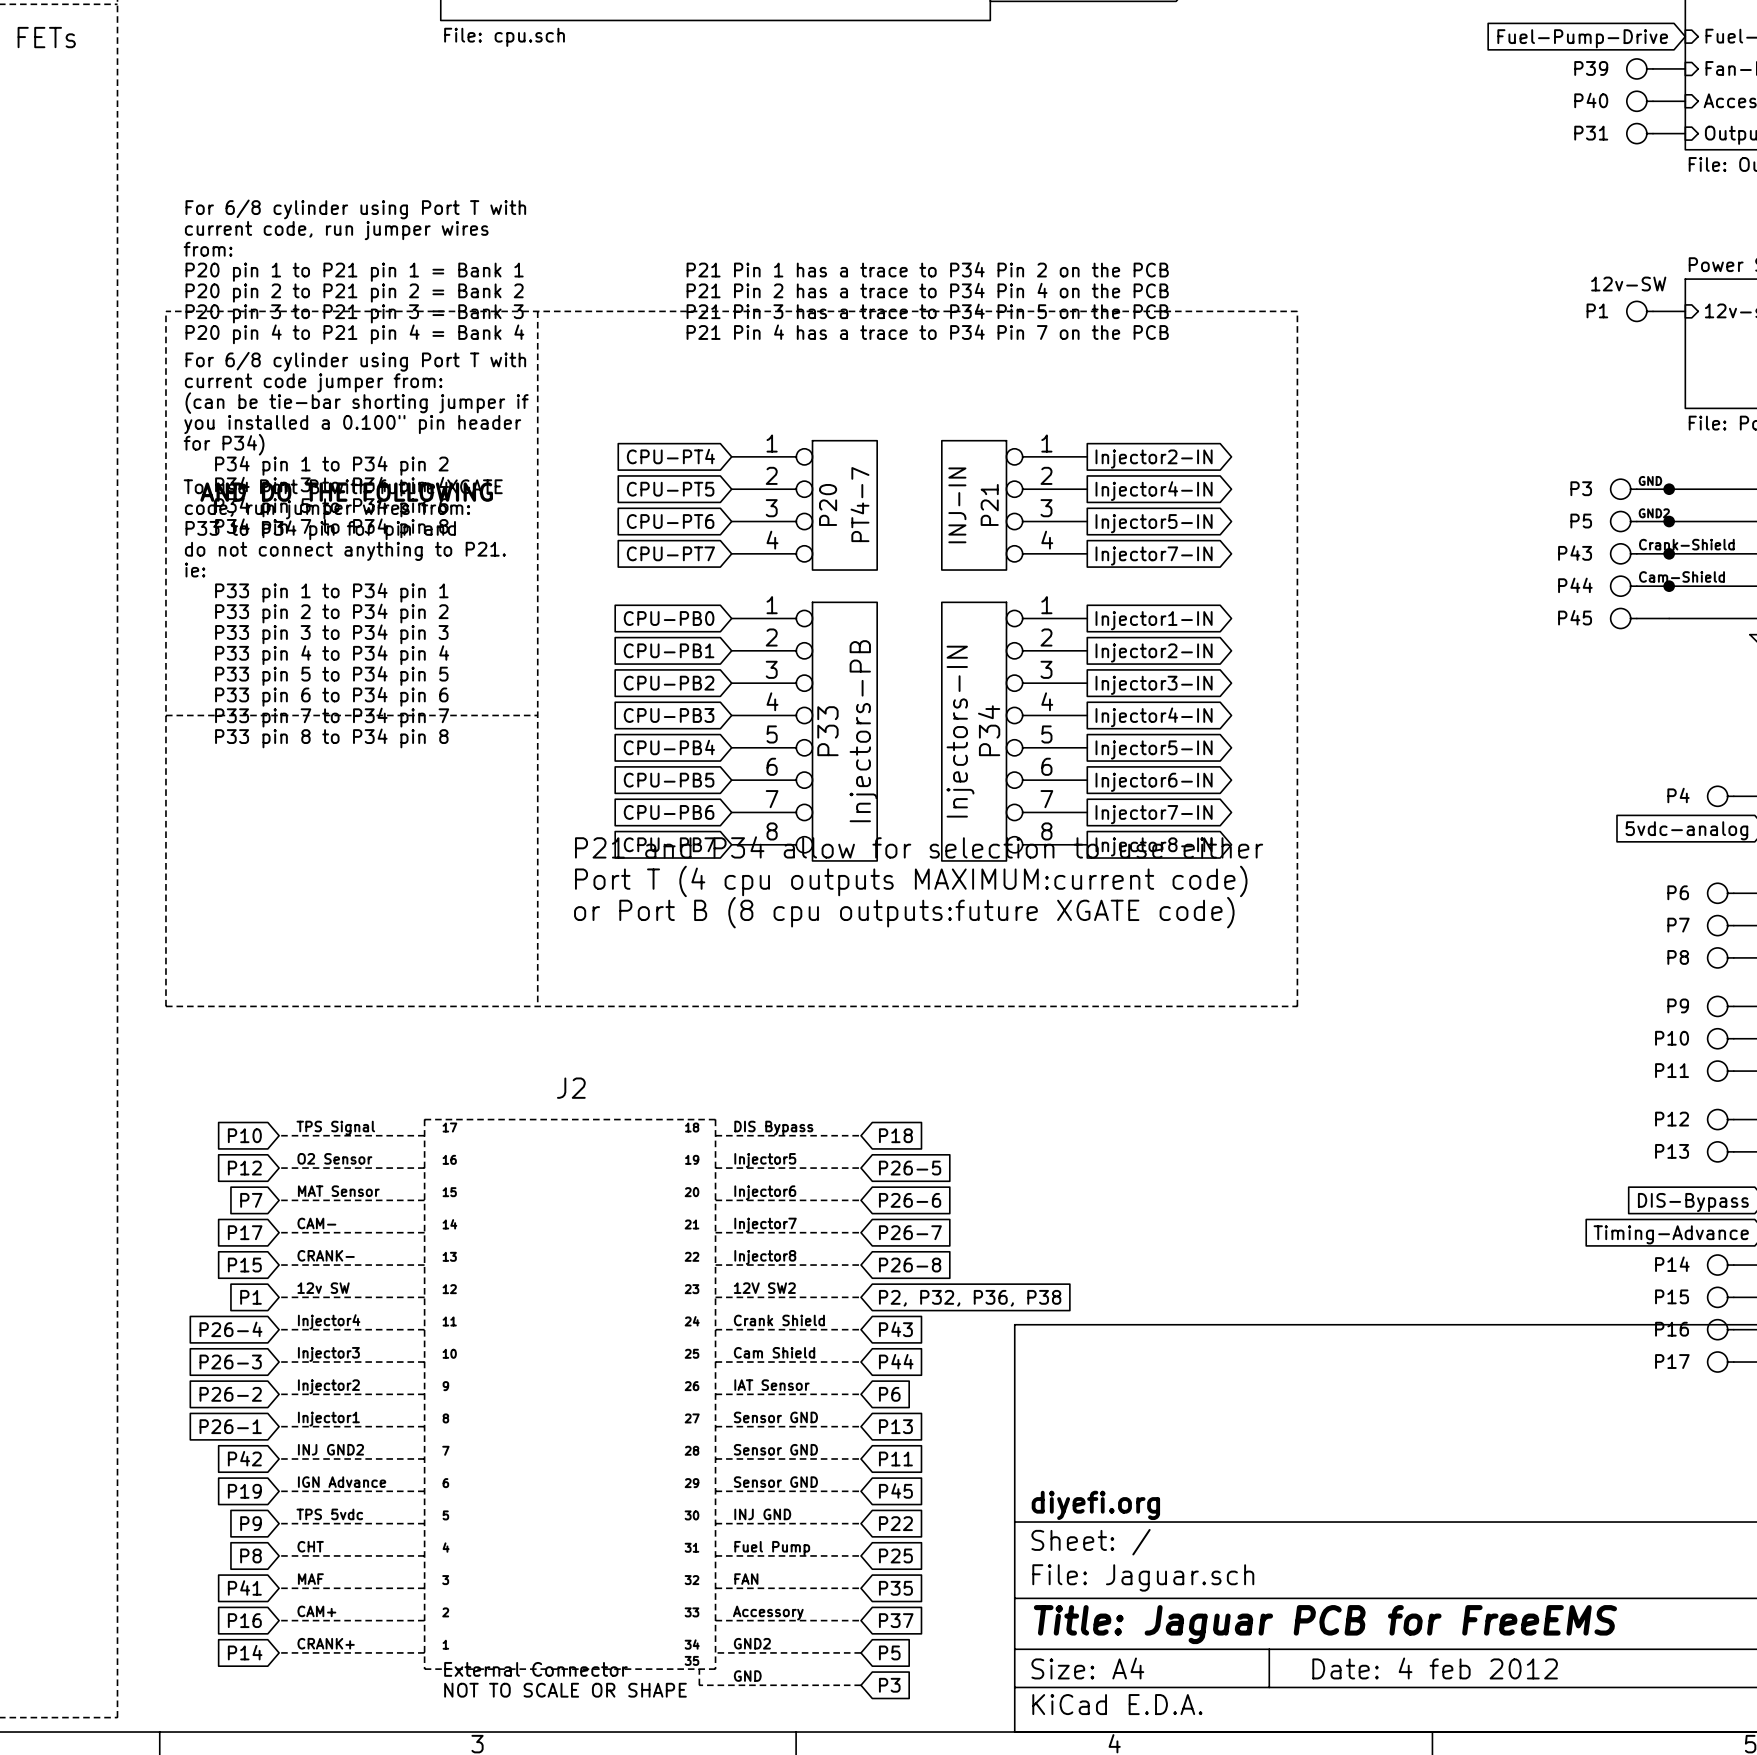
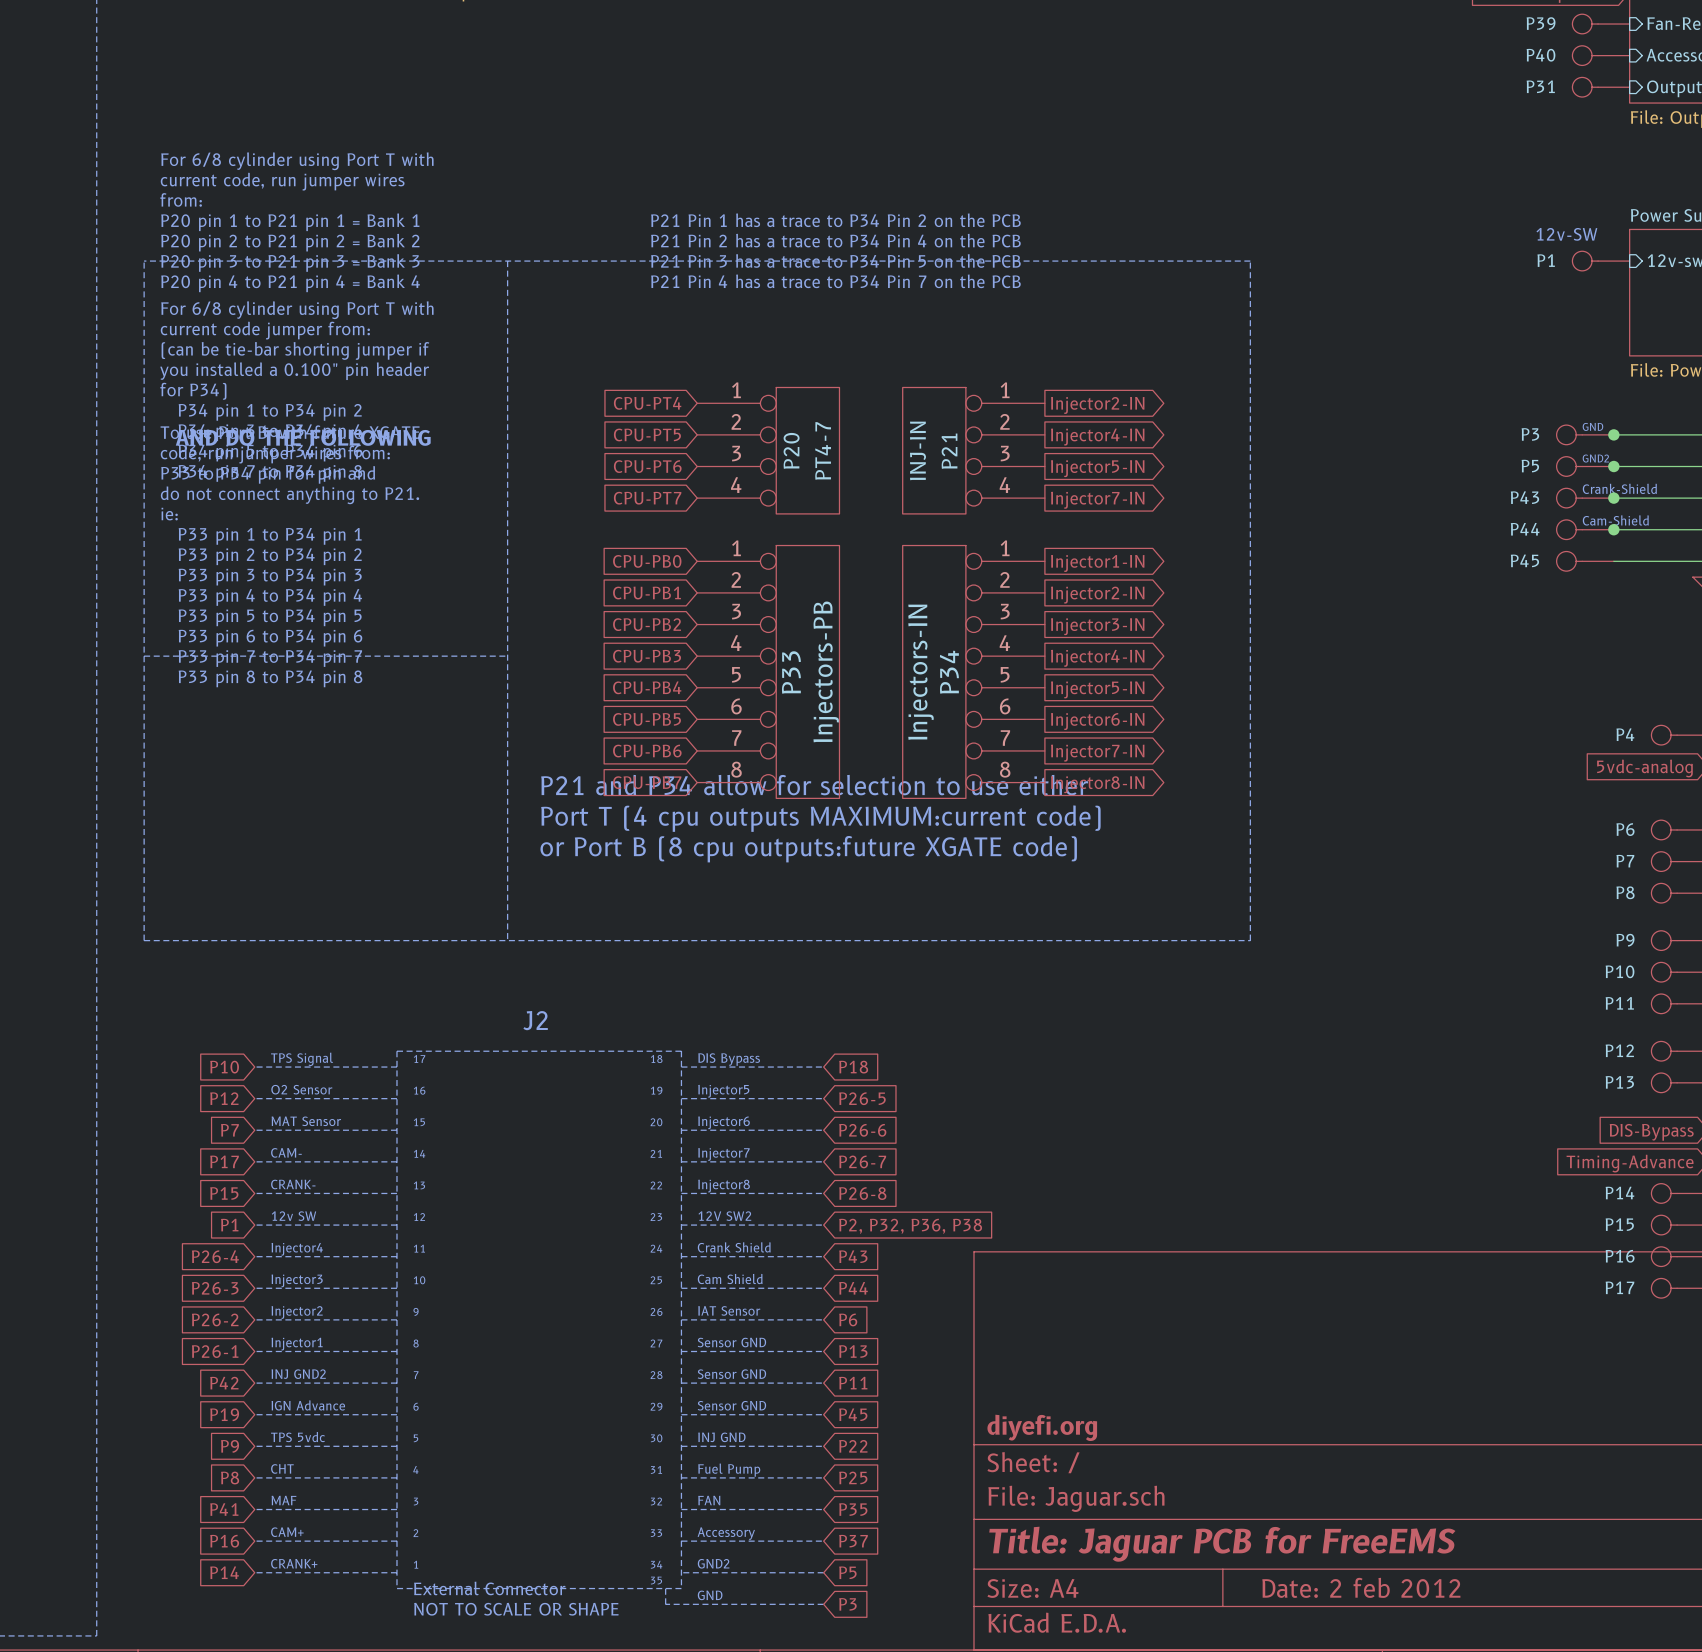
title block: Date: 4 feb 2012 (1435, 1668) -> Date: 2 feb 2012 (1361, 1587)

